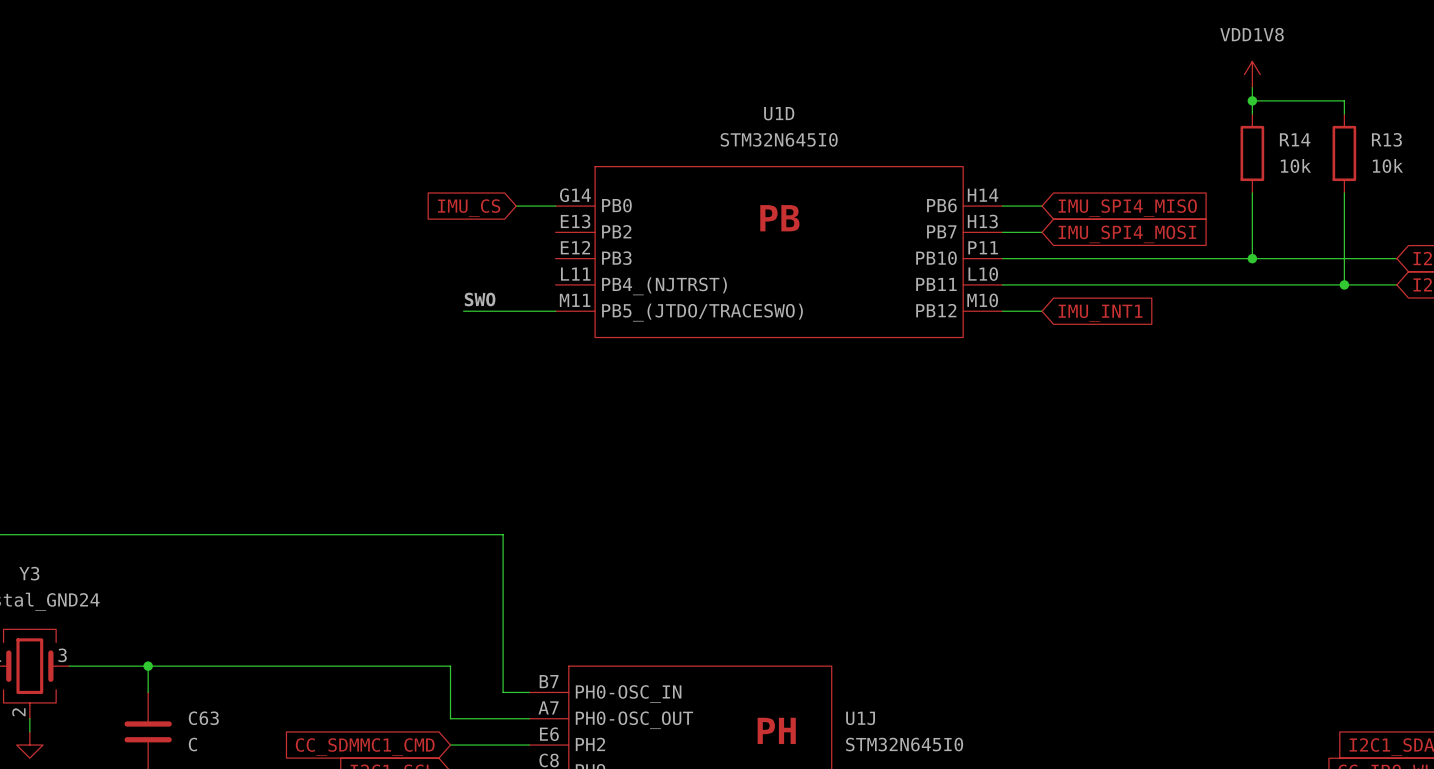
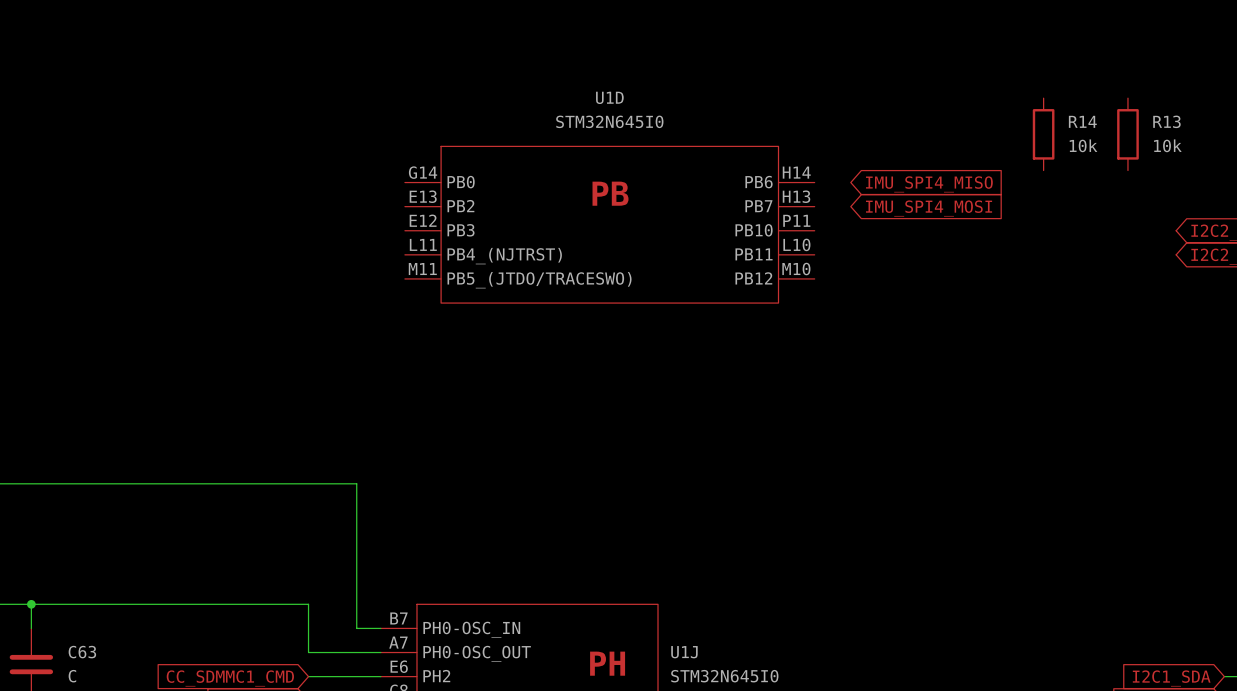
power symbol: VDD1V8 (1252, 74) -> none
wire: (1252, 87) (1252, 114) -> none
wire: (1252, 100) (1344, 100) (1344, 114) -> none
junction: (1252, 100) -> none
wire: (1252, 192) (1252, 258) -> none
wire: (1344, 192) (1344, 284) -> none
wire: (516, 206) (555, 206) -> none
wire: (1002, 206) (1042, 206) -> none
global label: IMU_CS (469, 208) -> none
wire: (1002, 232) (1042, 232) -> none
wire: (1002, 258) (1396, 258) -> none
junction: (1252, 258) -> none
wire: (1002, 284) (1396, 284) -> none
junction: (1344, 284) -> none
label: SWO (480, 299) -> none
wire: (463, 311) (555, 311) -> none
wire: (1002, 311) (1042, 311) -> none
global label: IMU_INT1 (1100, 313) -> none

